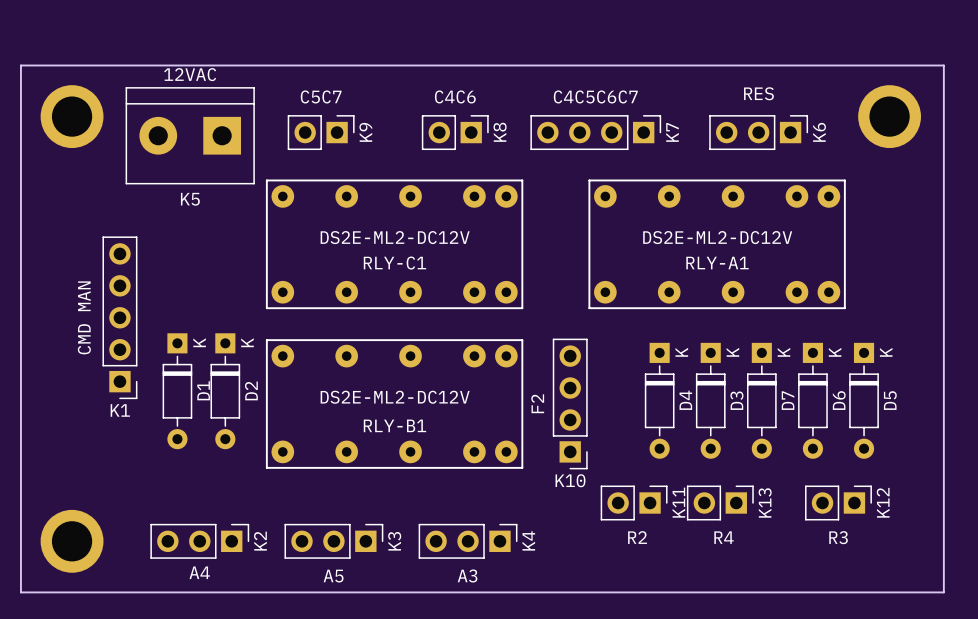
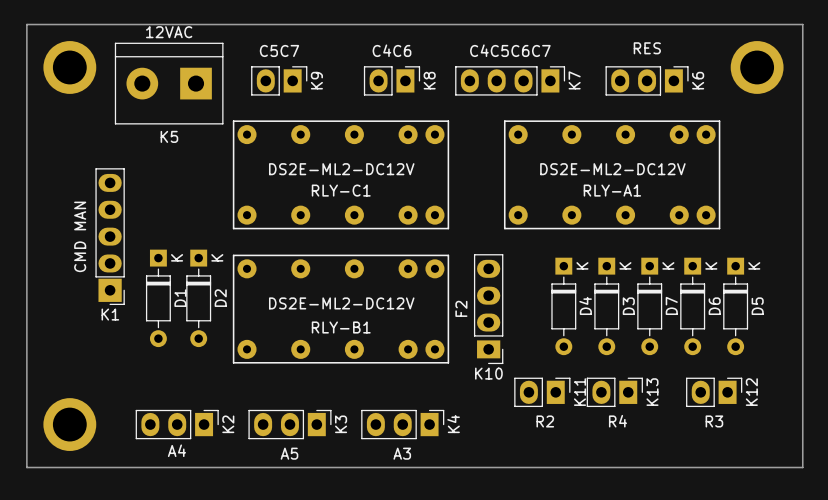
K9 footprint: [287, 115, 355, 151] -> [251, 66, 308, 96]
K8 footprint: [421, 115, 489, 151] -> [363, 66, 421, 96]
K7 footprint: [530, 115, 662, 151] -> [455, 66, 566, 96]
K6 footprint: [709, 115, 809, 151] -> [605, 66, 689, 96]
K1 footprint: [102, 236, 138, 400] -> [95, 168, 125, 306]
K10 footprint: [552, 338, 588, 470] -> [473, 254, 504, 365]
K11 footprint: [600, 485, 668, 521] -> [514, 377, 571, 408]
K13 footprint: [686, 485, 754, 521] -> [586, 377, 643, 408]
K12 footprint: [805, 485, 872, 521] -> [686, 377, 743, 408]
K2 footprint: [150, 523, 250, 559] -> [135, 409, 219, 440]
K3 footprint: [284, 523, 384, 559] -> [248, 409, 332, 440]
K4 footprint: [418, 523, 518, 559] -> [361, 409, 445, 440]

